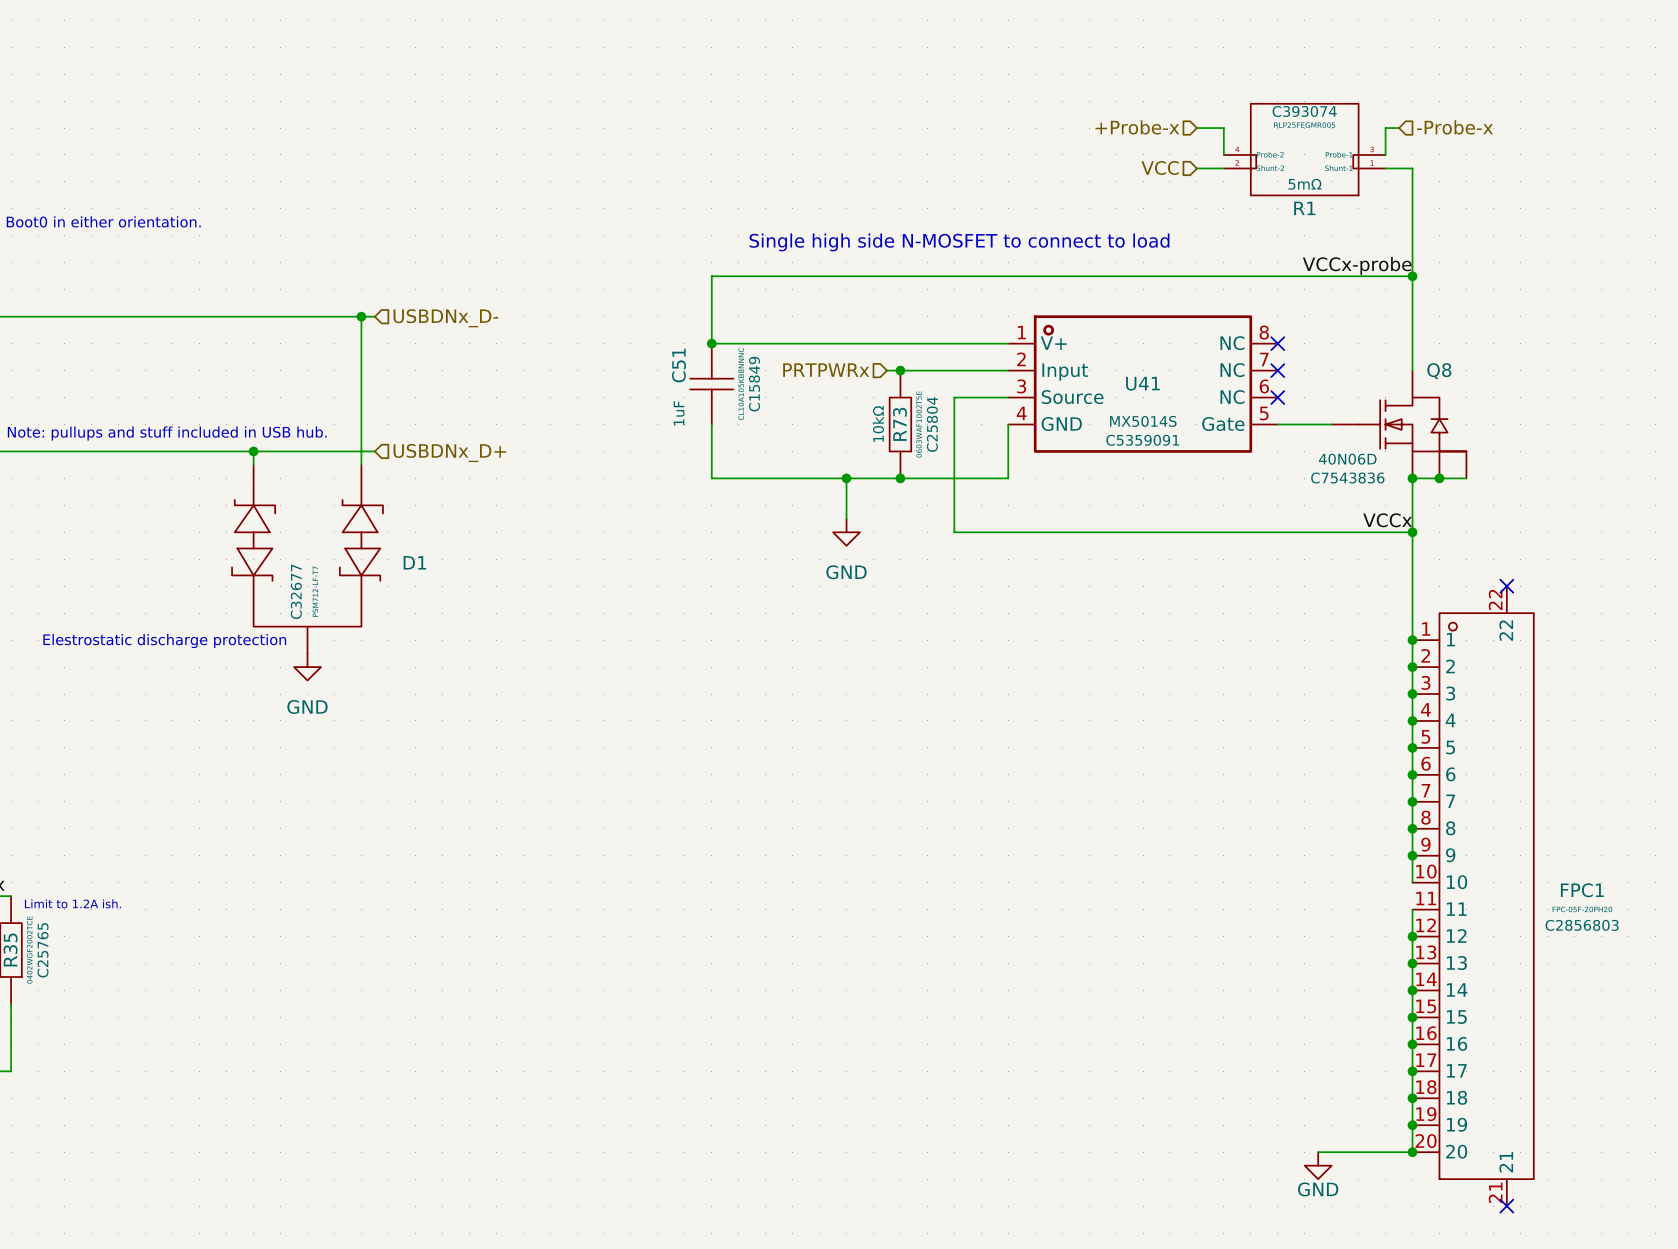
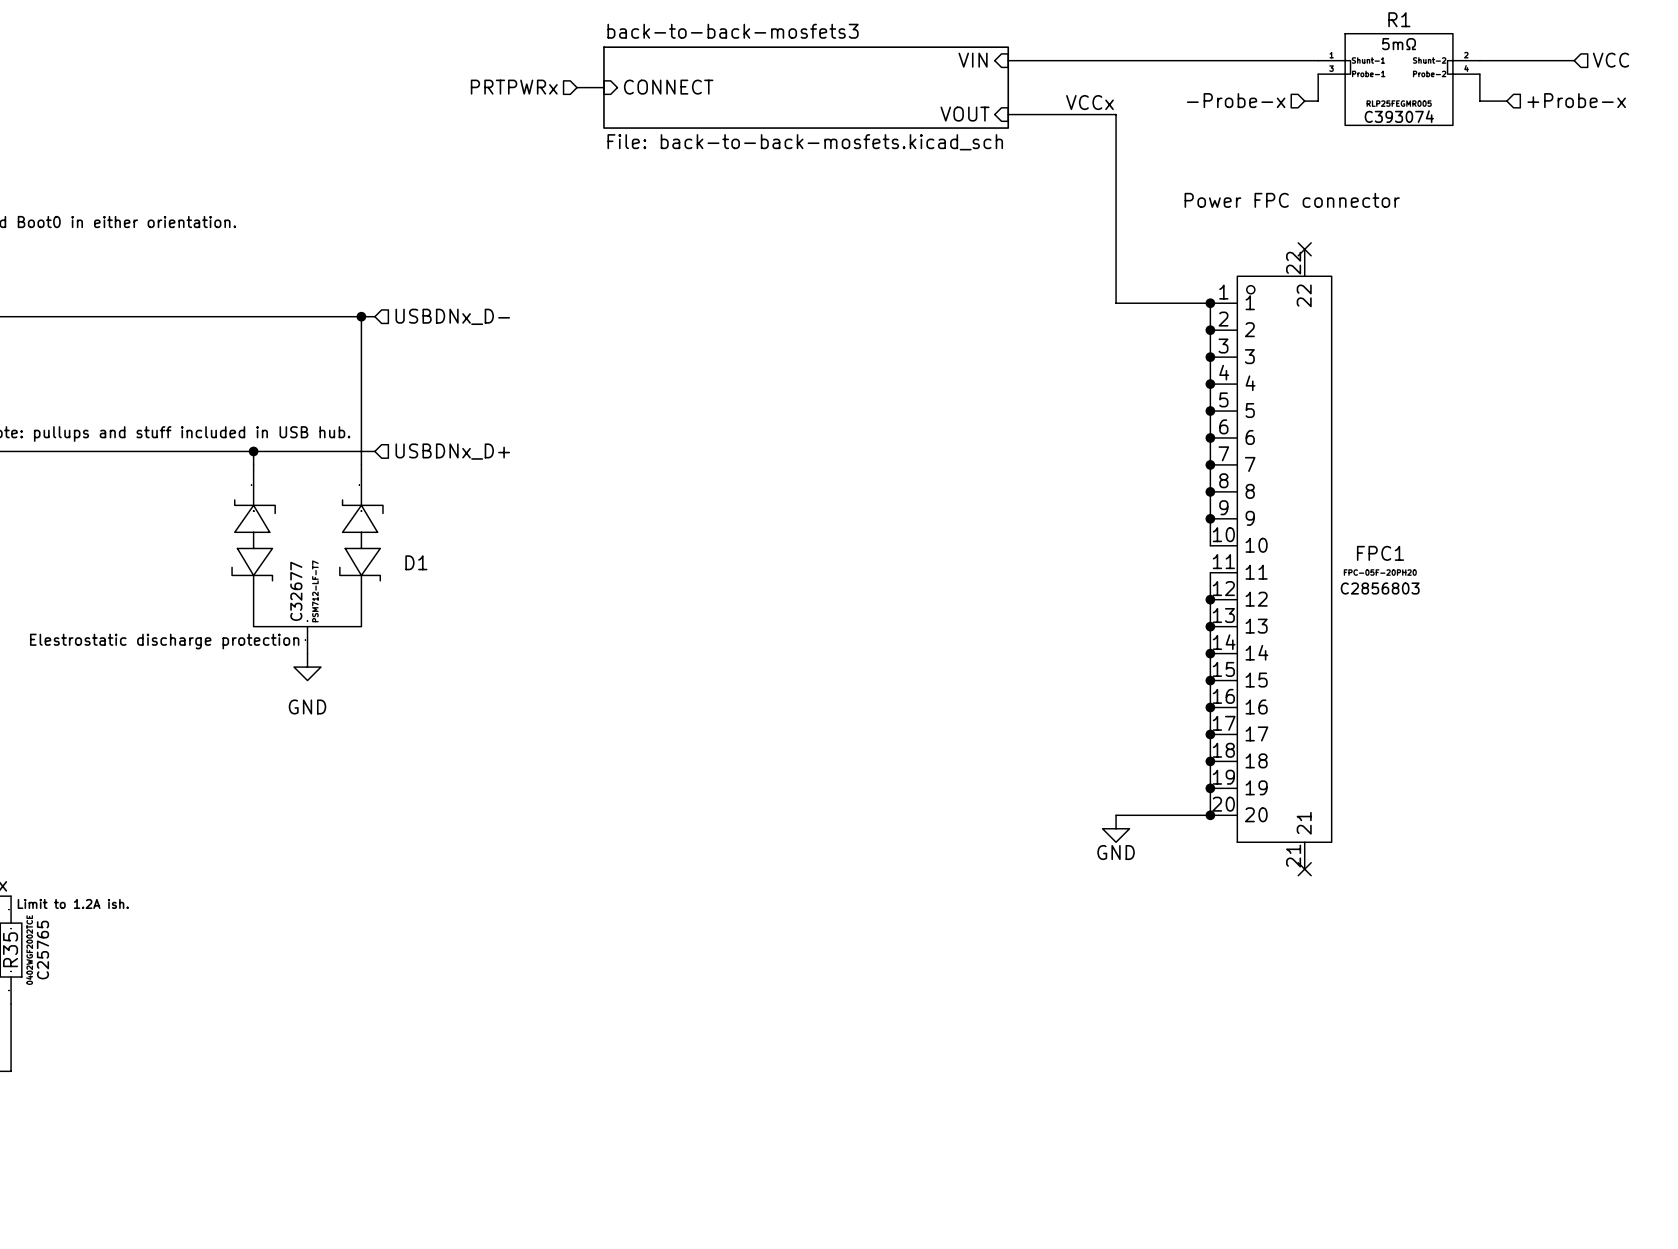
sheet pin: none -> VIN (973, 60)
wire: none -> (1008, 60) (1318, 60)
wire: none -> (1479, 60) (1574, 60)
hierarchical label: none -> VCC (1611, 60)
wire: none -> (1318, 74) (1318, 101) (1304, 101)
wire: none -> (1479, 74) (1479, 101) (1506, 101)
hierarchical label: none -> PRTPWRx (514, 87)
wire: none -> (577, 87) (603, 87)
sheet pin: none -> CONNECT (668, 87)
sheet back-to-back-mosfets3: none -> File: back-to-back-mosfets.kicad_sch (806, 87)
hierarchical label: none -> +Probe-x (1576, 100)
label: none -> VCCx (1089, 102)
sheet pin: none -> VOUT (965, 114)
wire: none -> (1008, 114) (1116, 114) (1116, 303) (1210, 303) (1210, 545)
hierarchical label: +Probe-x (1137, 127) -> none
hierarchical label rotation: 0° (1455, 127) -> 180° (1236, 100)
hierarchical label position: -Probe-x (1455, 127) -> -Probe-x (1236, 100)
wire: (1196, 128) (1223, 128) (1223, 154) -> none
wire: (1399, 128) (1385, 128) (1385, 154) -> none
R1 rotation: 0° (1304, 149) -> 180° (1399, 79)
R1 position: (1304, 149) -> (1399, 79)
hierarchical label: VCC (1160, 167) -> none
wire: (1196, 168) (1223, 168) -> none
wire: (1385, 168) (1412, 168) (1412, 370) -> none
text: none -> Power FPC connector (1292, 200)
text: Single high side N-MOSFET to connect to load (959, 242) -> none
no-connect mark: none -> (1304, 249)
label: VCCx-probe (1357, 265) -> none
wire: (1412, 276) (711, 276) (711, 343) (1008, 343) -> none
junction: (1412, 276) -> none
junction: none -> (1210, 303)
junction: none -> (1210, 330)
junction: (711, 343) -> none
no-connect mark: (1277, 343) -> none
junction: none -> (1210, 357)
hierarchical label: PRTPWRx (826, 370) -> none
wire: (886, 370) (1008, 370) -> none
junction: (900, 370) -> none
no-connect mark: (1277, 370) -> none
C51: 1uF (711, 384) -> none
U41: (1143, 384) -> none
junction: none -> (1210, 384)
wire: (1008, 397) (954, 397) (954, 532) (1412, 532) -> none
no-connect mark: (1277, 397) -> none
junction: none -> (1210, 411)
wire: (711, 424) (711, 478) (1008, 478) (1008, 424) -> none
R73: 10kΩ (900, 424) -> none
wire: (1277, 424) (1331, 424) -> none
Q8: (1399, 424) -> none
junction: none -> (1210, 437)
junction: none -> (1210, 464)
wire: (846, 478) (846, 518) -> none
junction: (846, 478) -> none
junction: (900, 478) -> none
junction: (1412, 478) -> none
junction: (1439, 478) -> none
wire: (1466, 478) (1412, 478) (1412, 882) -> none
junction: none -> (1210, 491)
junction: none -> (1210, 518)
label: VCCx (1387, 520) -> none
power symbol: GND (846, 532) -> none
junction: (1412, 532) -> none
wire: none -> (1210, 572) (1210, 815) (1116, 815)
no-connect mark: (1506, 586) -> none
junction: none -> (1210, 599)
junction: none -> (1210, 626)
junction: (1412, 640) -> none
junction: none -> (1210, 653)
junction: (1412, 667) -> none
junction: none -> (1210, 680)
junction: (1412, 694) -> none
junction: none -> (1210, 707)
junction: (1412, 720) -> none
junction: none -> (1210, 734)
junction: (1412, 747) -> none
junction: none -> (1210, 761)
junction: (1412, 774) -> none
junction: none -> (1210, 788)
junction: (1412, 801) -> none
junction: none -> (1210, 815)
power symbol: none -> GND (1116, 828)
junction: (1412, 828) -> none
junction: (1412, 855) -> none
no-connect mark: none -> (1304, 869)
FPC1 position: (1473, 896) -> (1271, 559)
wire: (1412, 909) (1412, 1152) (1318, 1152) -> none
junction: (1412, 936) -> none
junction: (1412, 963) -> none
junction: (1412, 990) -> none
junction: (1412, 1017) -> none
junction: (1412, 1044) -> none
junction: (1412, 1071) -> none
junction: (1412, 1098) -> none
junction: (1412, 1125) -> none
junction: (1412, 1152) -> none
power symbol: GND (1318, 1165) -> none
no-connect mark: (1506, 1206) -> none

